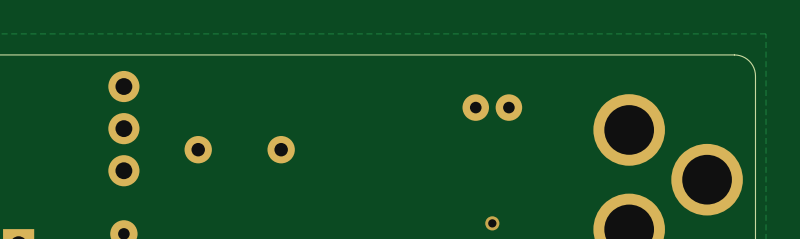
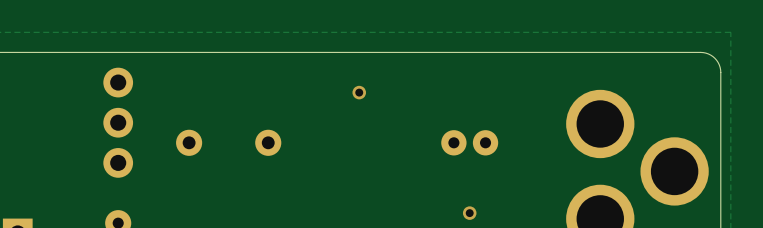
via: none -> (359, 92)
part position: (492, 107) -> (469, 142)

